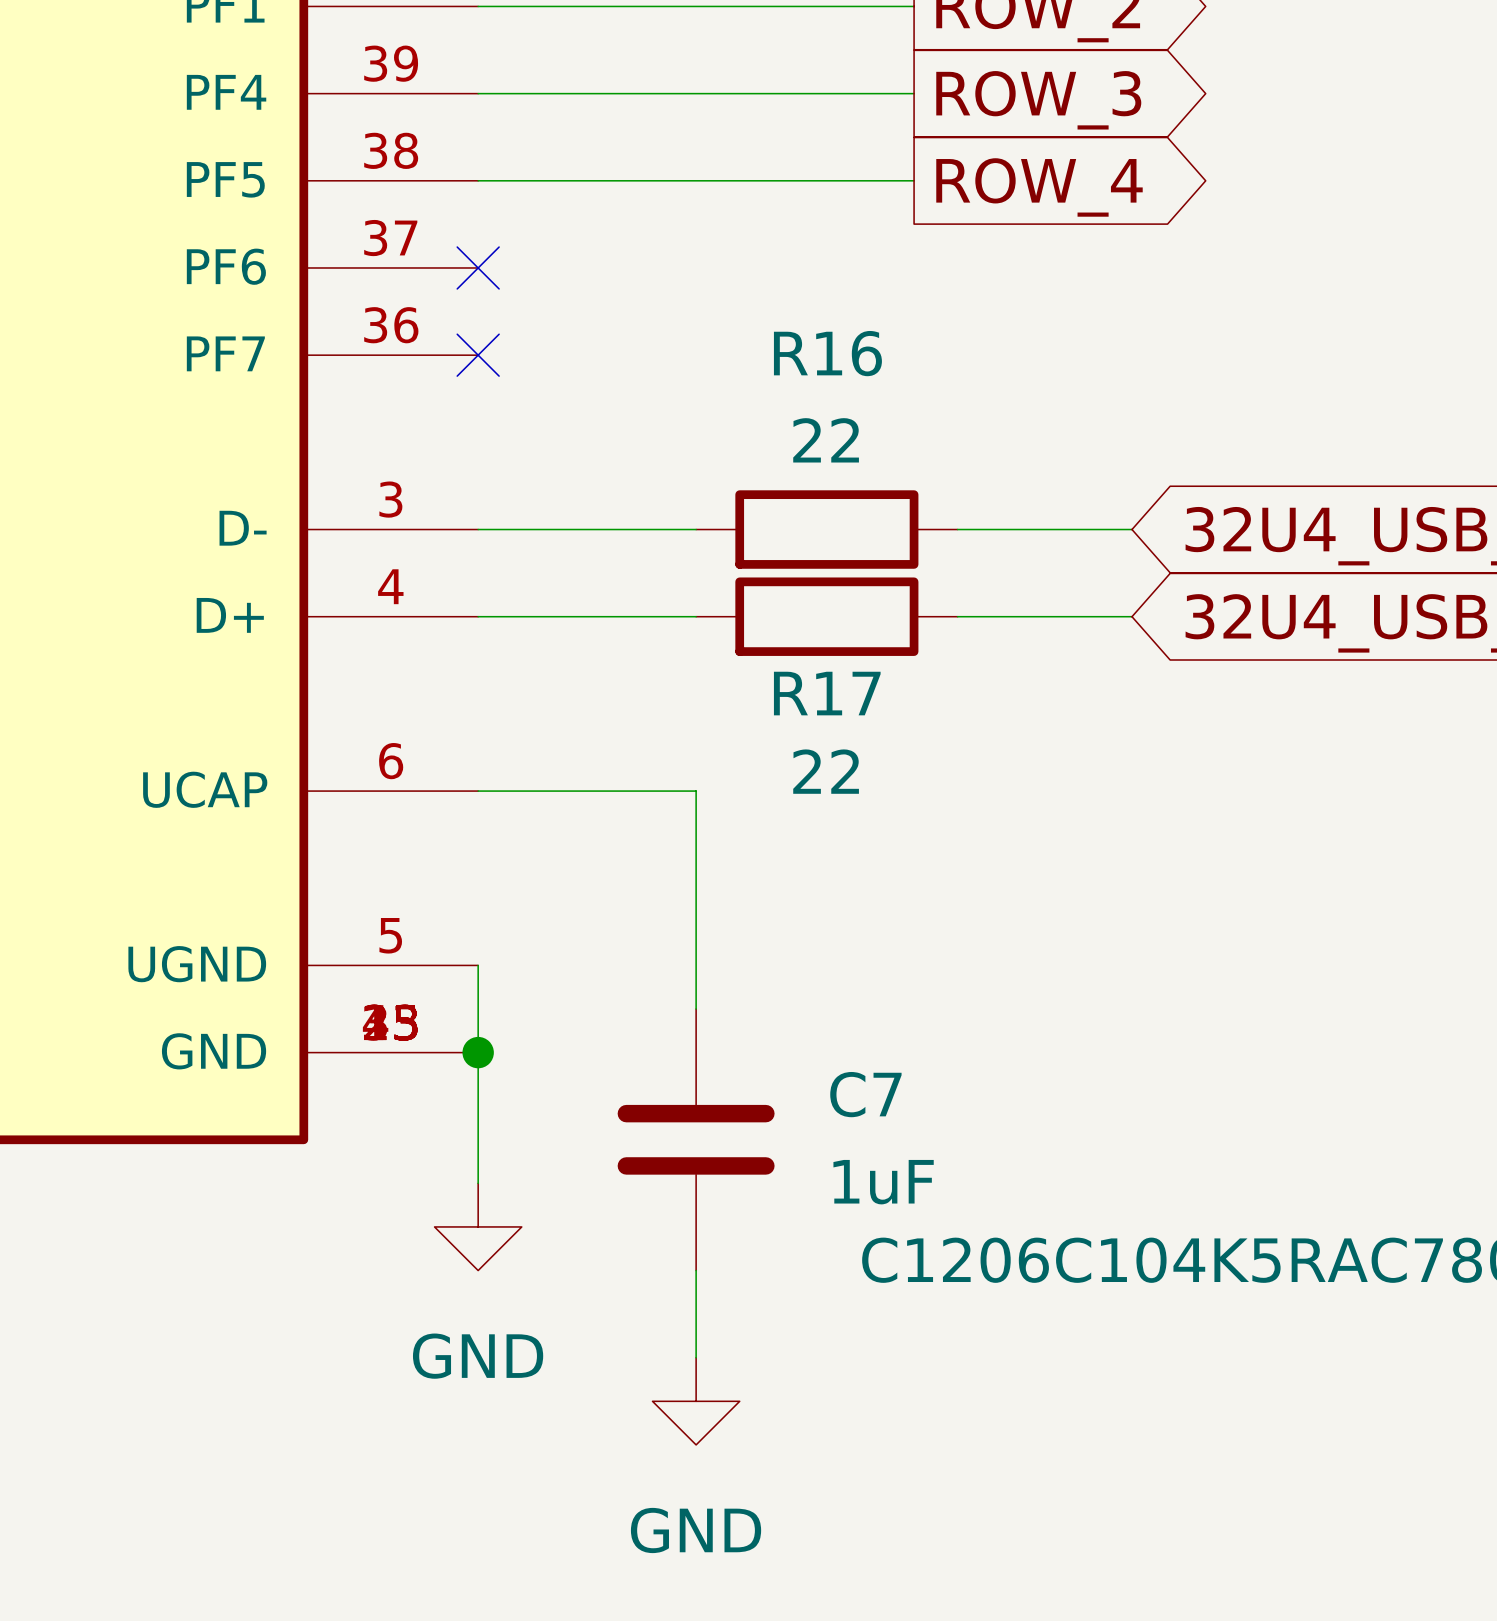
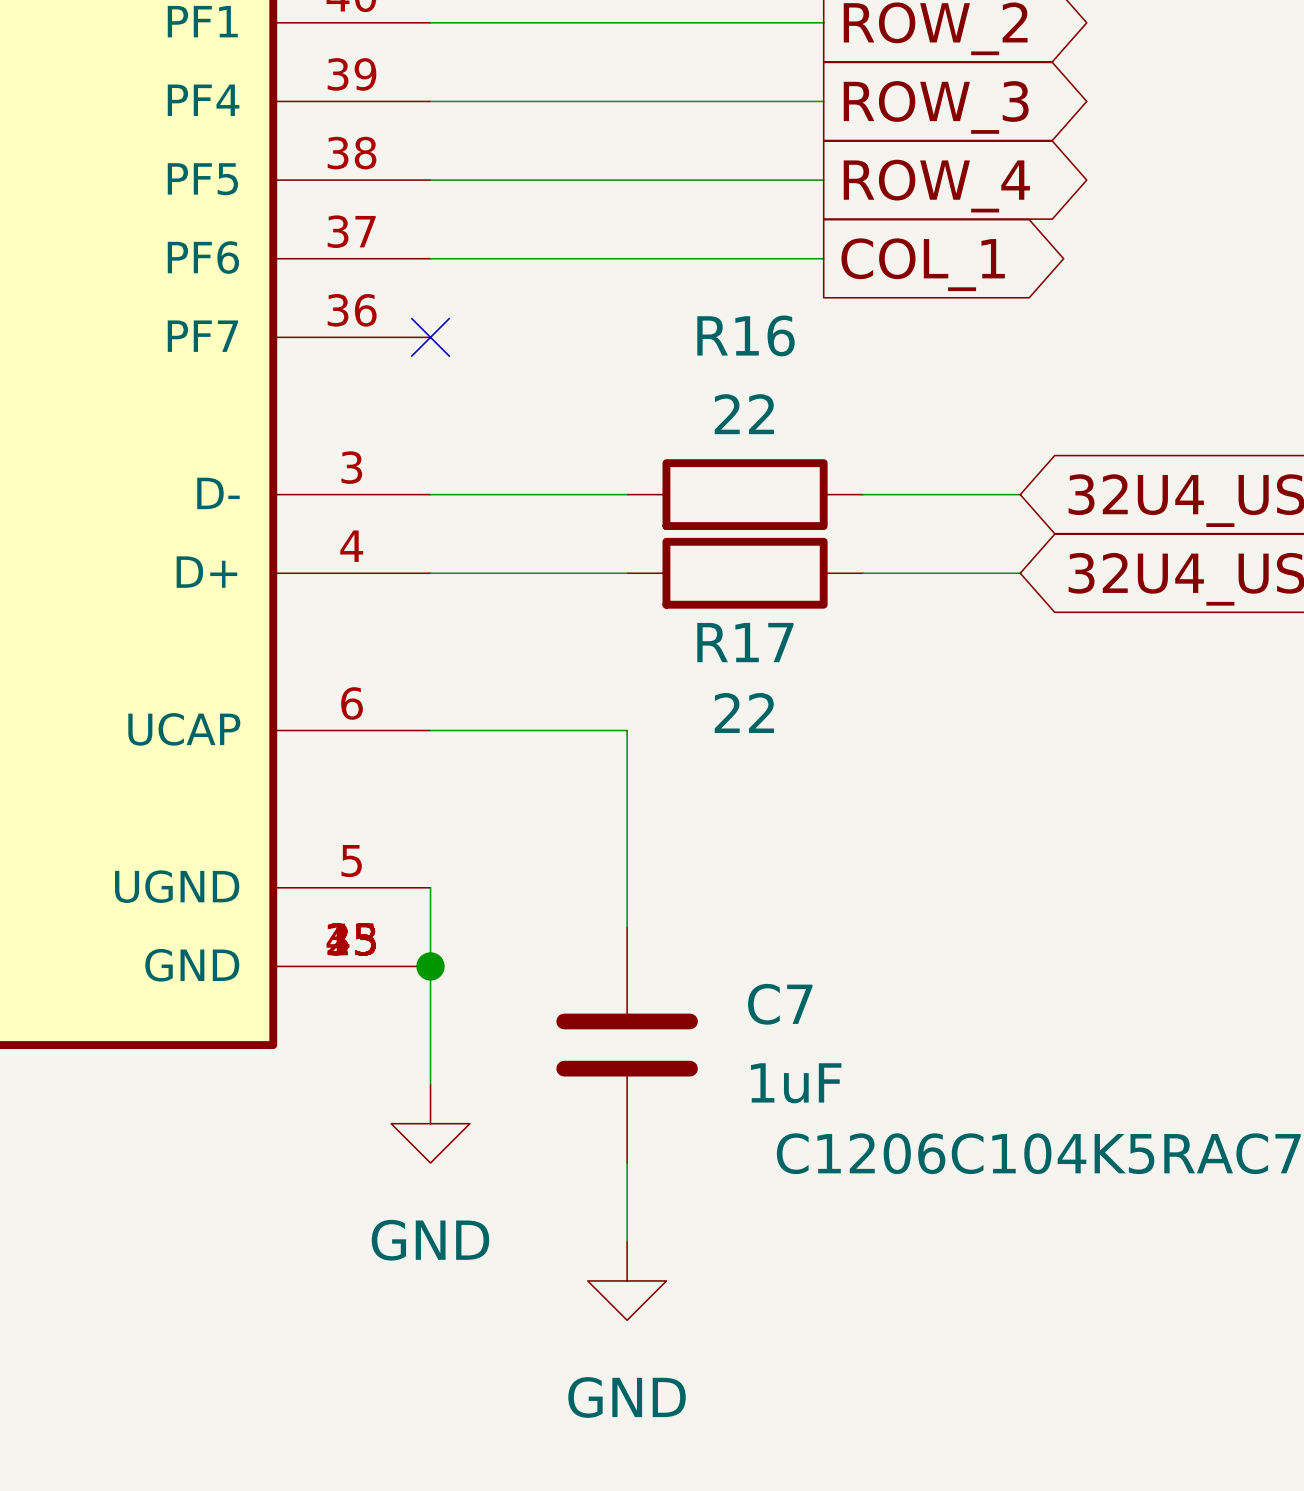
wire: none -> (430, 258) (823, 258)
no-connect mark: (478, 267) -> none
global label: none -> COL_1 (923, 264)

